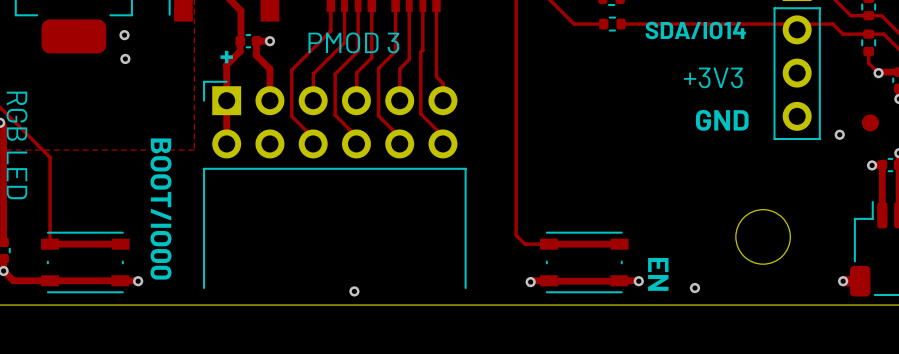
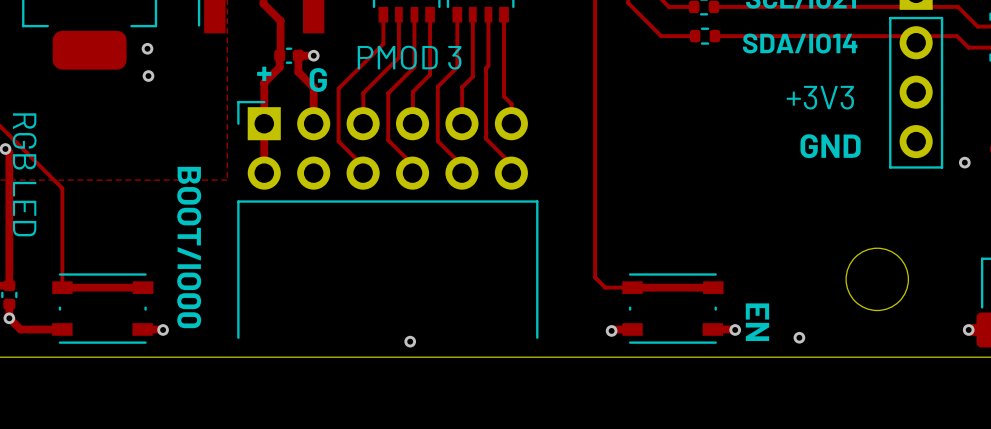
text: none -> G (318, 79)
track: (50, 280) (120, 280) -> none
track: (549, 281) (618, 281) -> none

